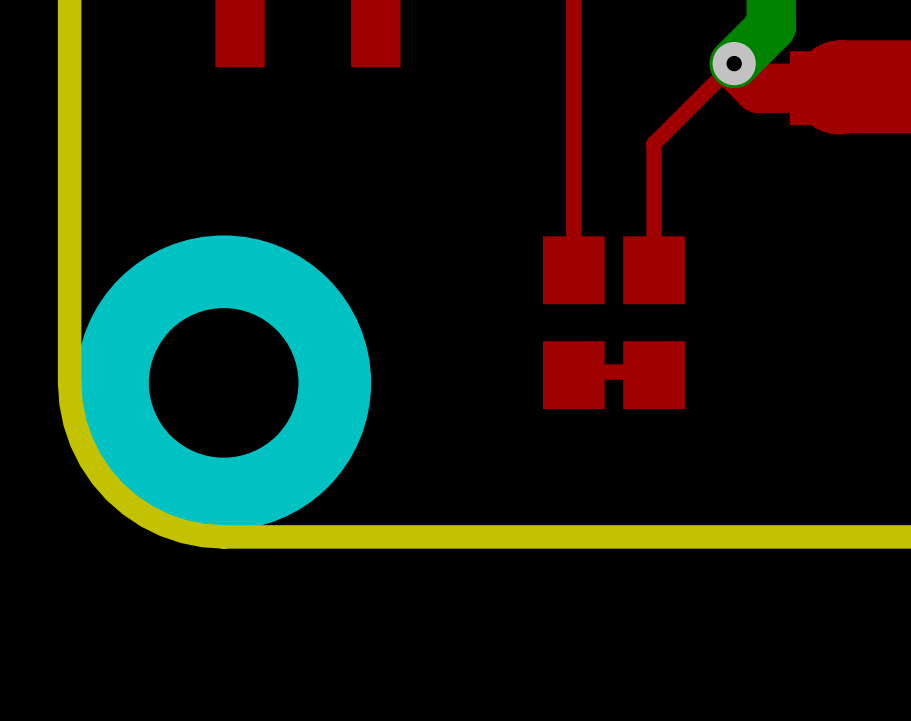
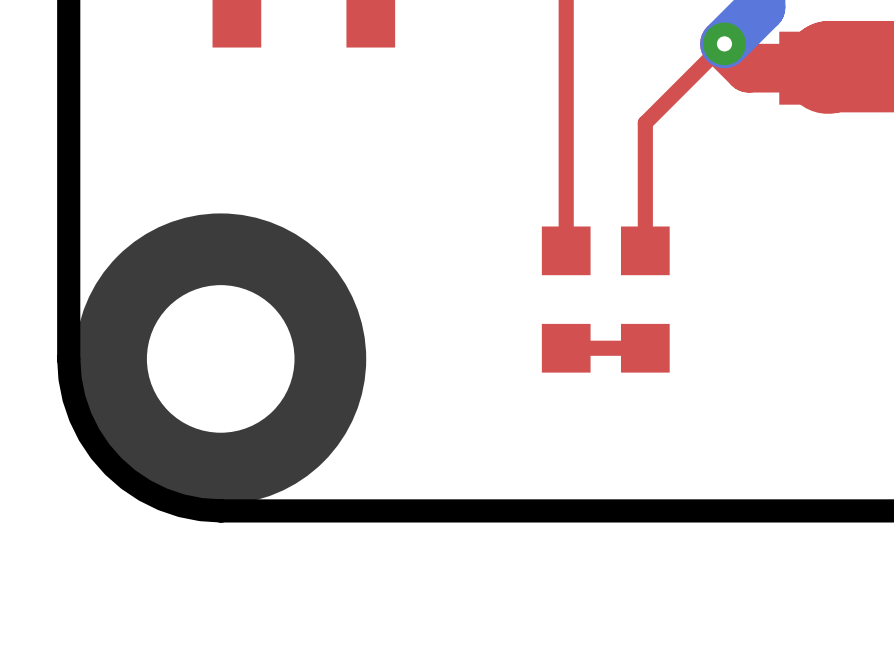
part footprint: [542, 236, 605, 410] -> [541, 226, 591, 373]
part footprint: [623, 236, 685, 410] -> [620, 226, 670, 373]

